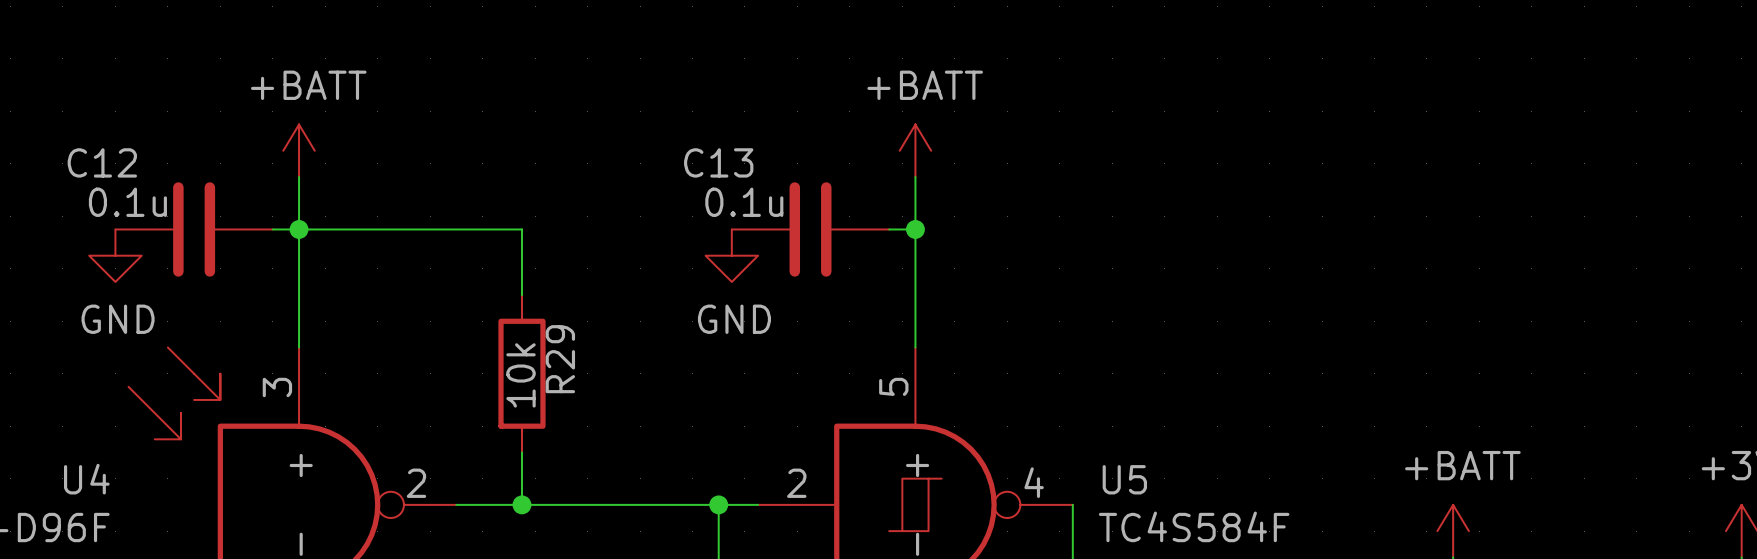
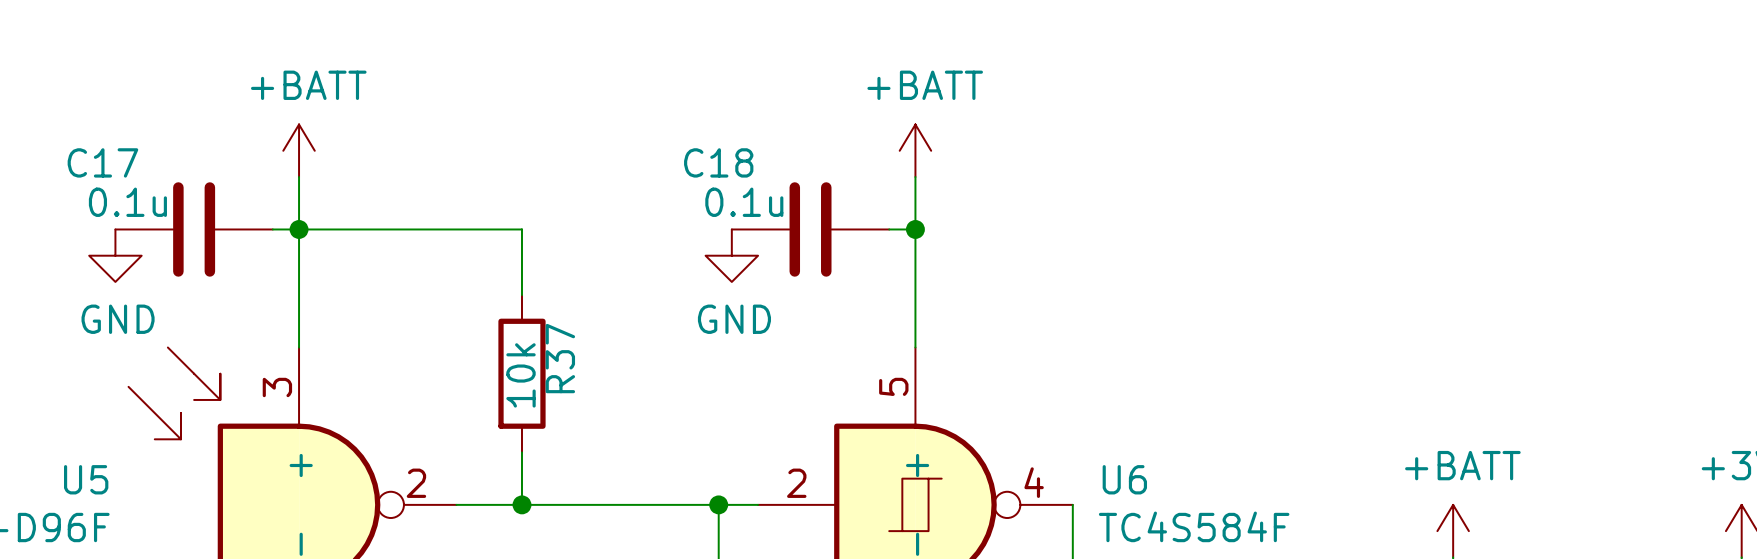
C12 name: C12 (102, 162) -> C17 (102, 162)
C13 name: C13 (718, 162) -> C18 (718, 162)
R29 name: R29 (560, 359) -> R37 (560, 358)
U4 name: U4 (86, 479) -> U5 (86, 479)
U5 name: U5 (1124, 479) -> U6 (1124, 479)

